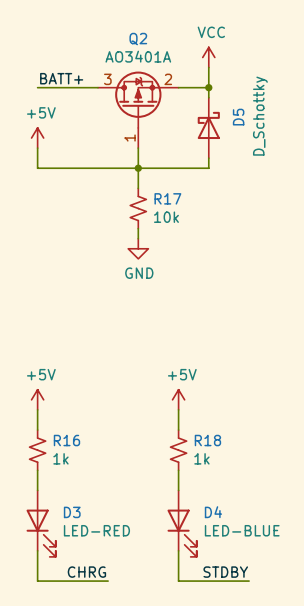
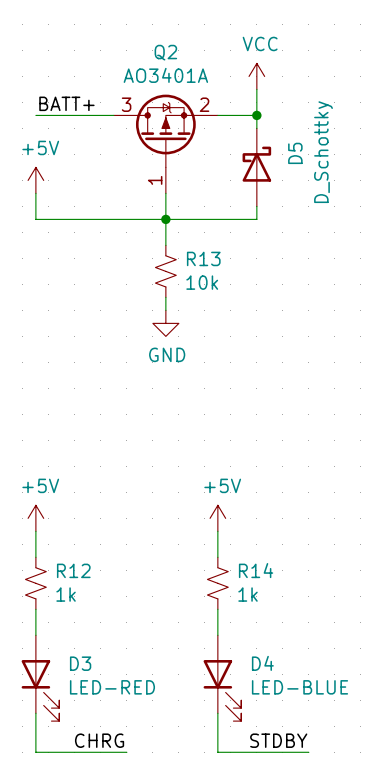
R17 name: R17 (167, 198) -> R13 (203, 258)
R16 name: R16 (66, 440) -> R12 (73, 570)
R18 name: R18 (207, 440) -> R14 (256, 570)

